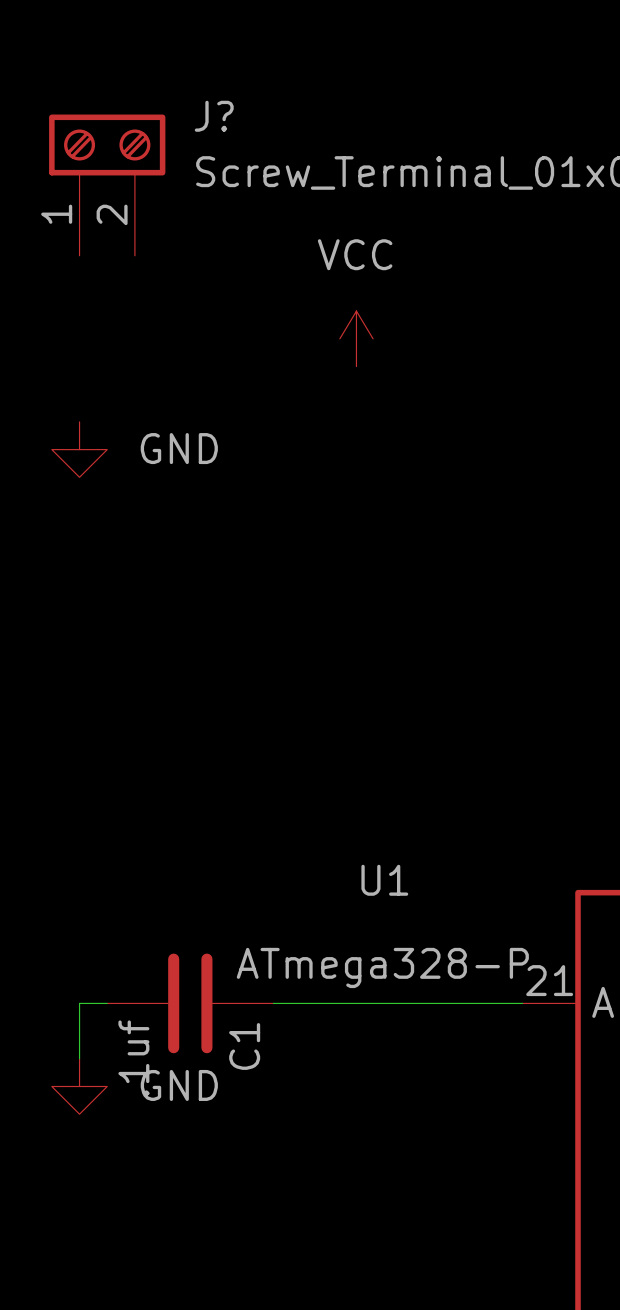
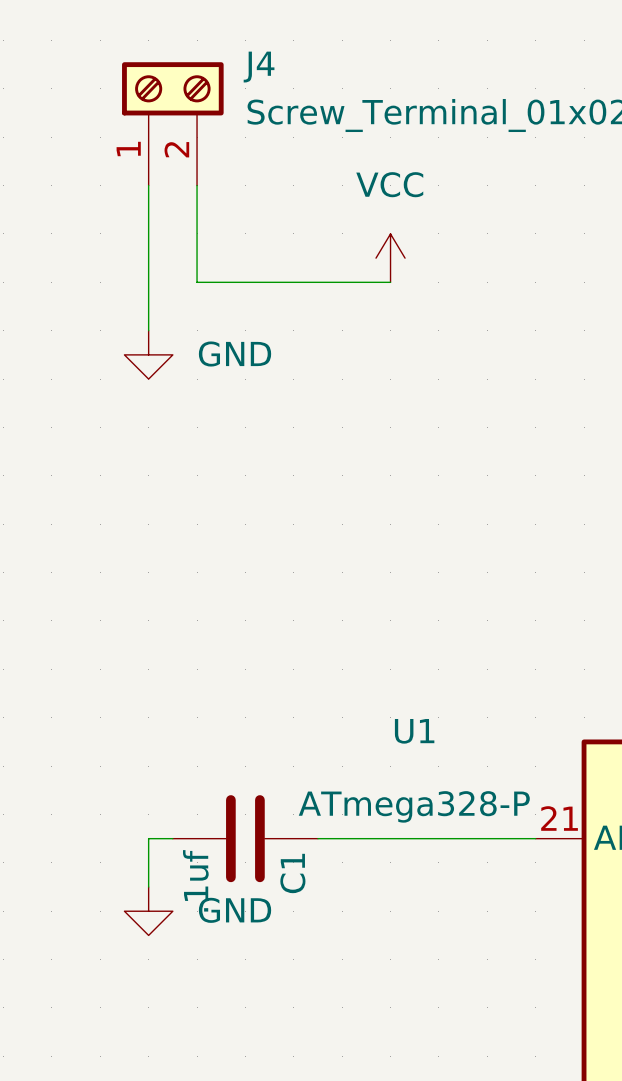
J? name: J? (214, 116) -> J4 (259, 67)
wire: none -> (148, 185) (148, 330)
wire: none -> (197, 185) (197, 282) (390, 282)

